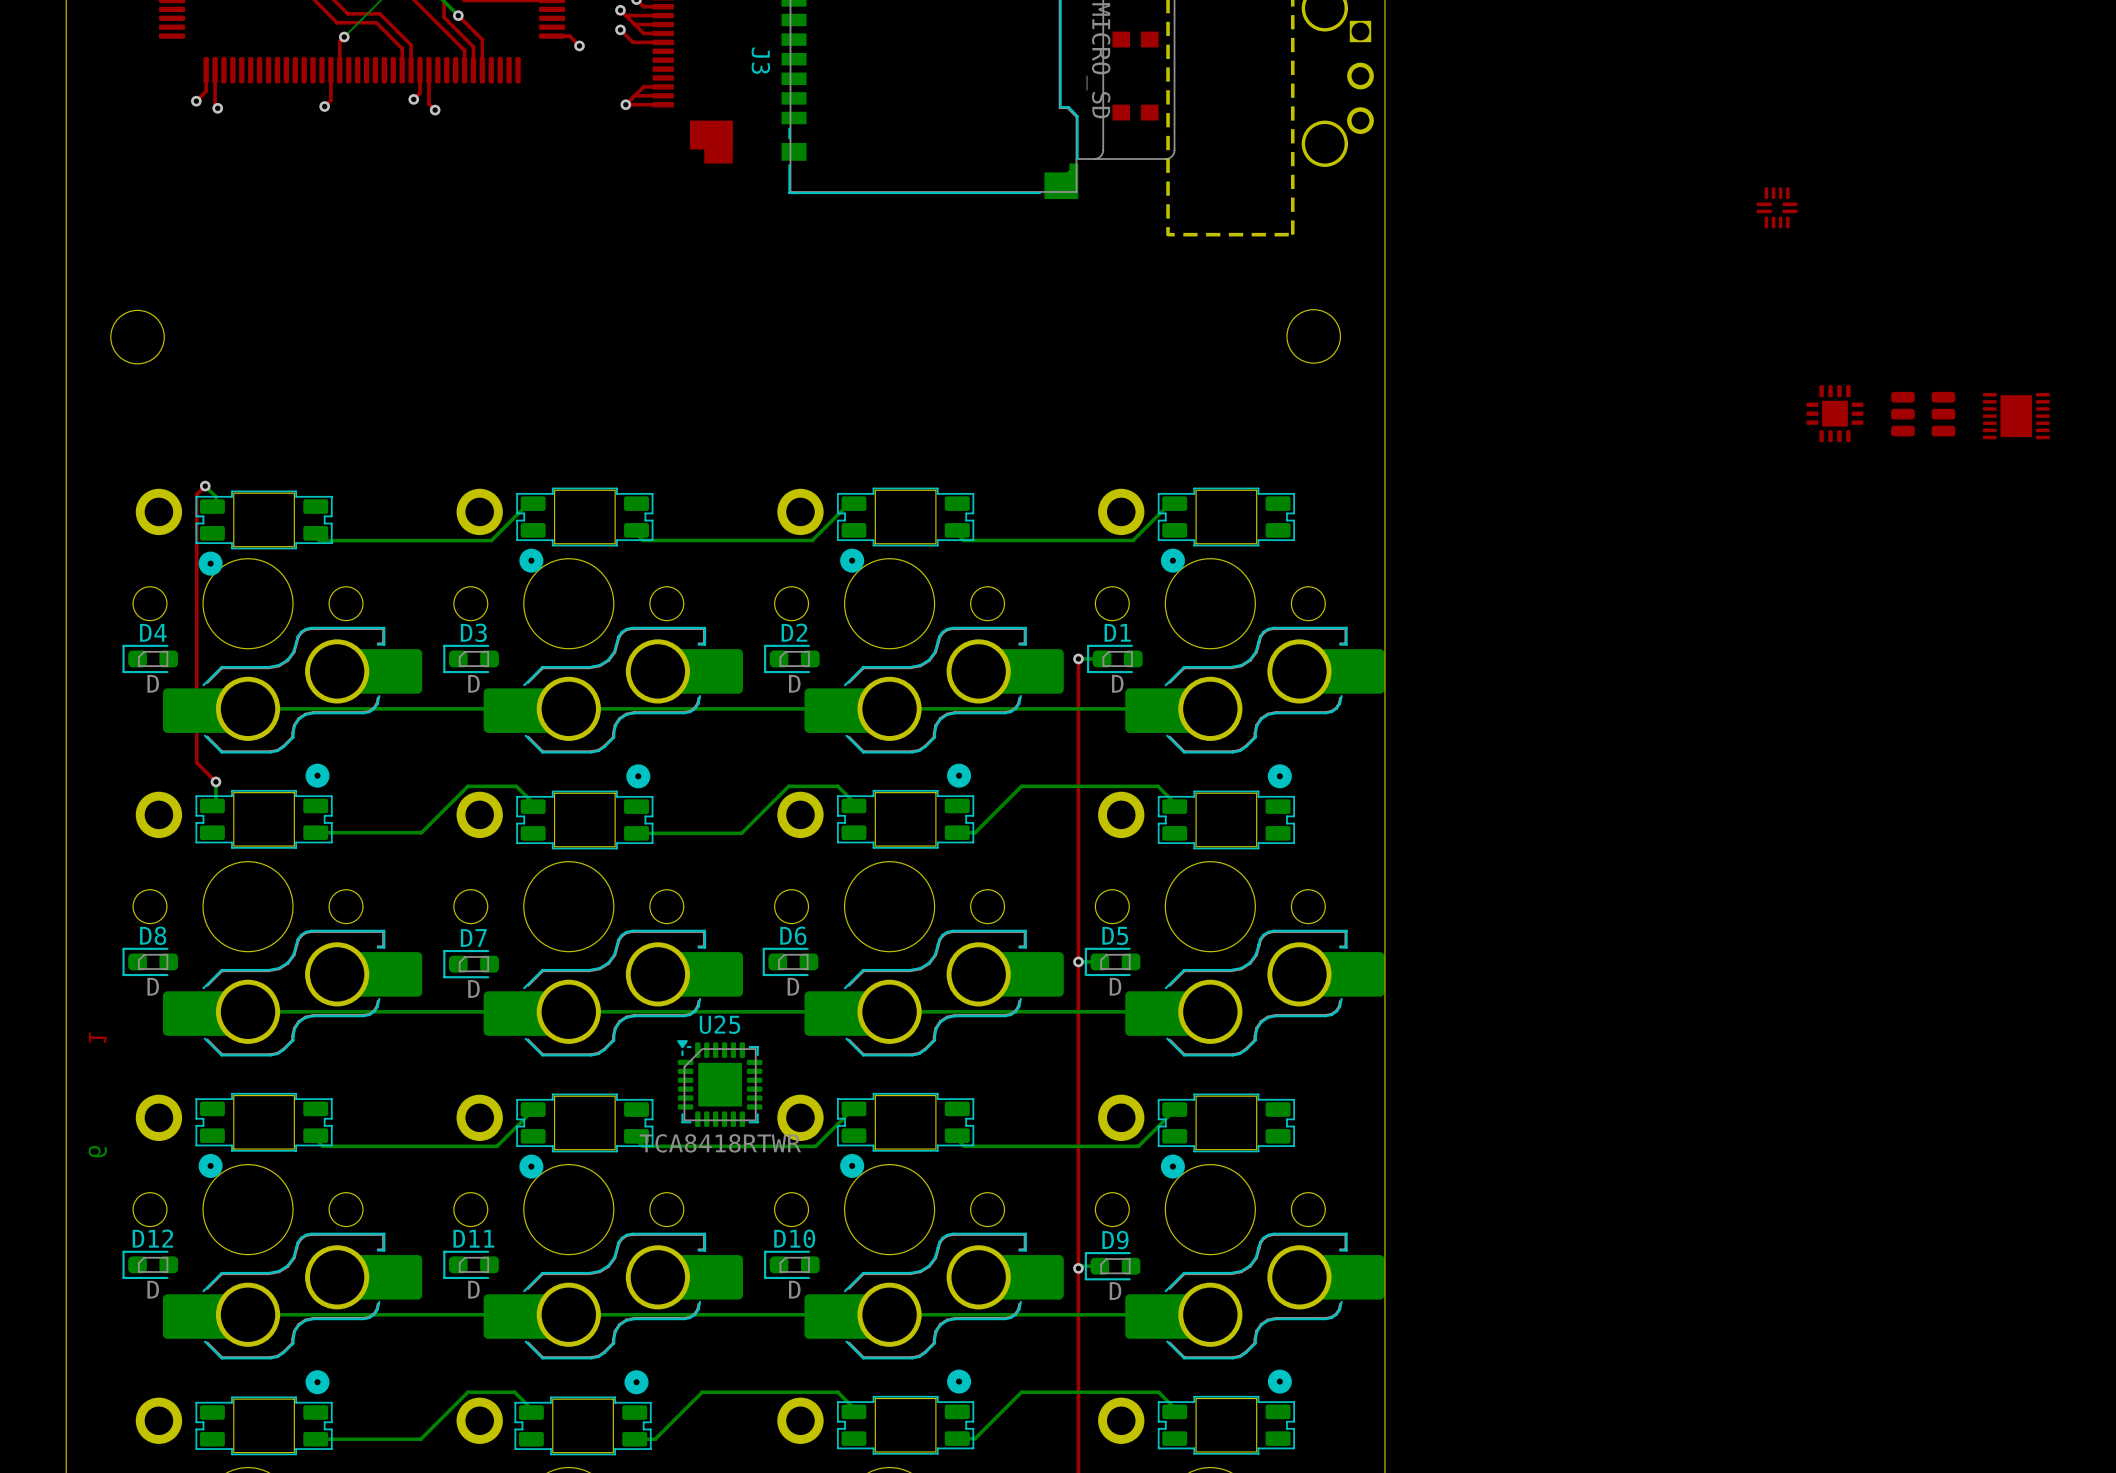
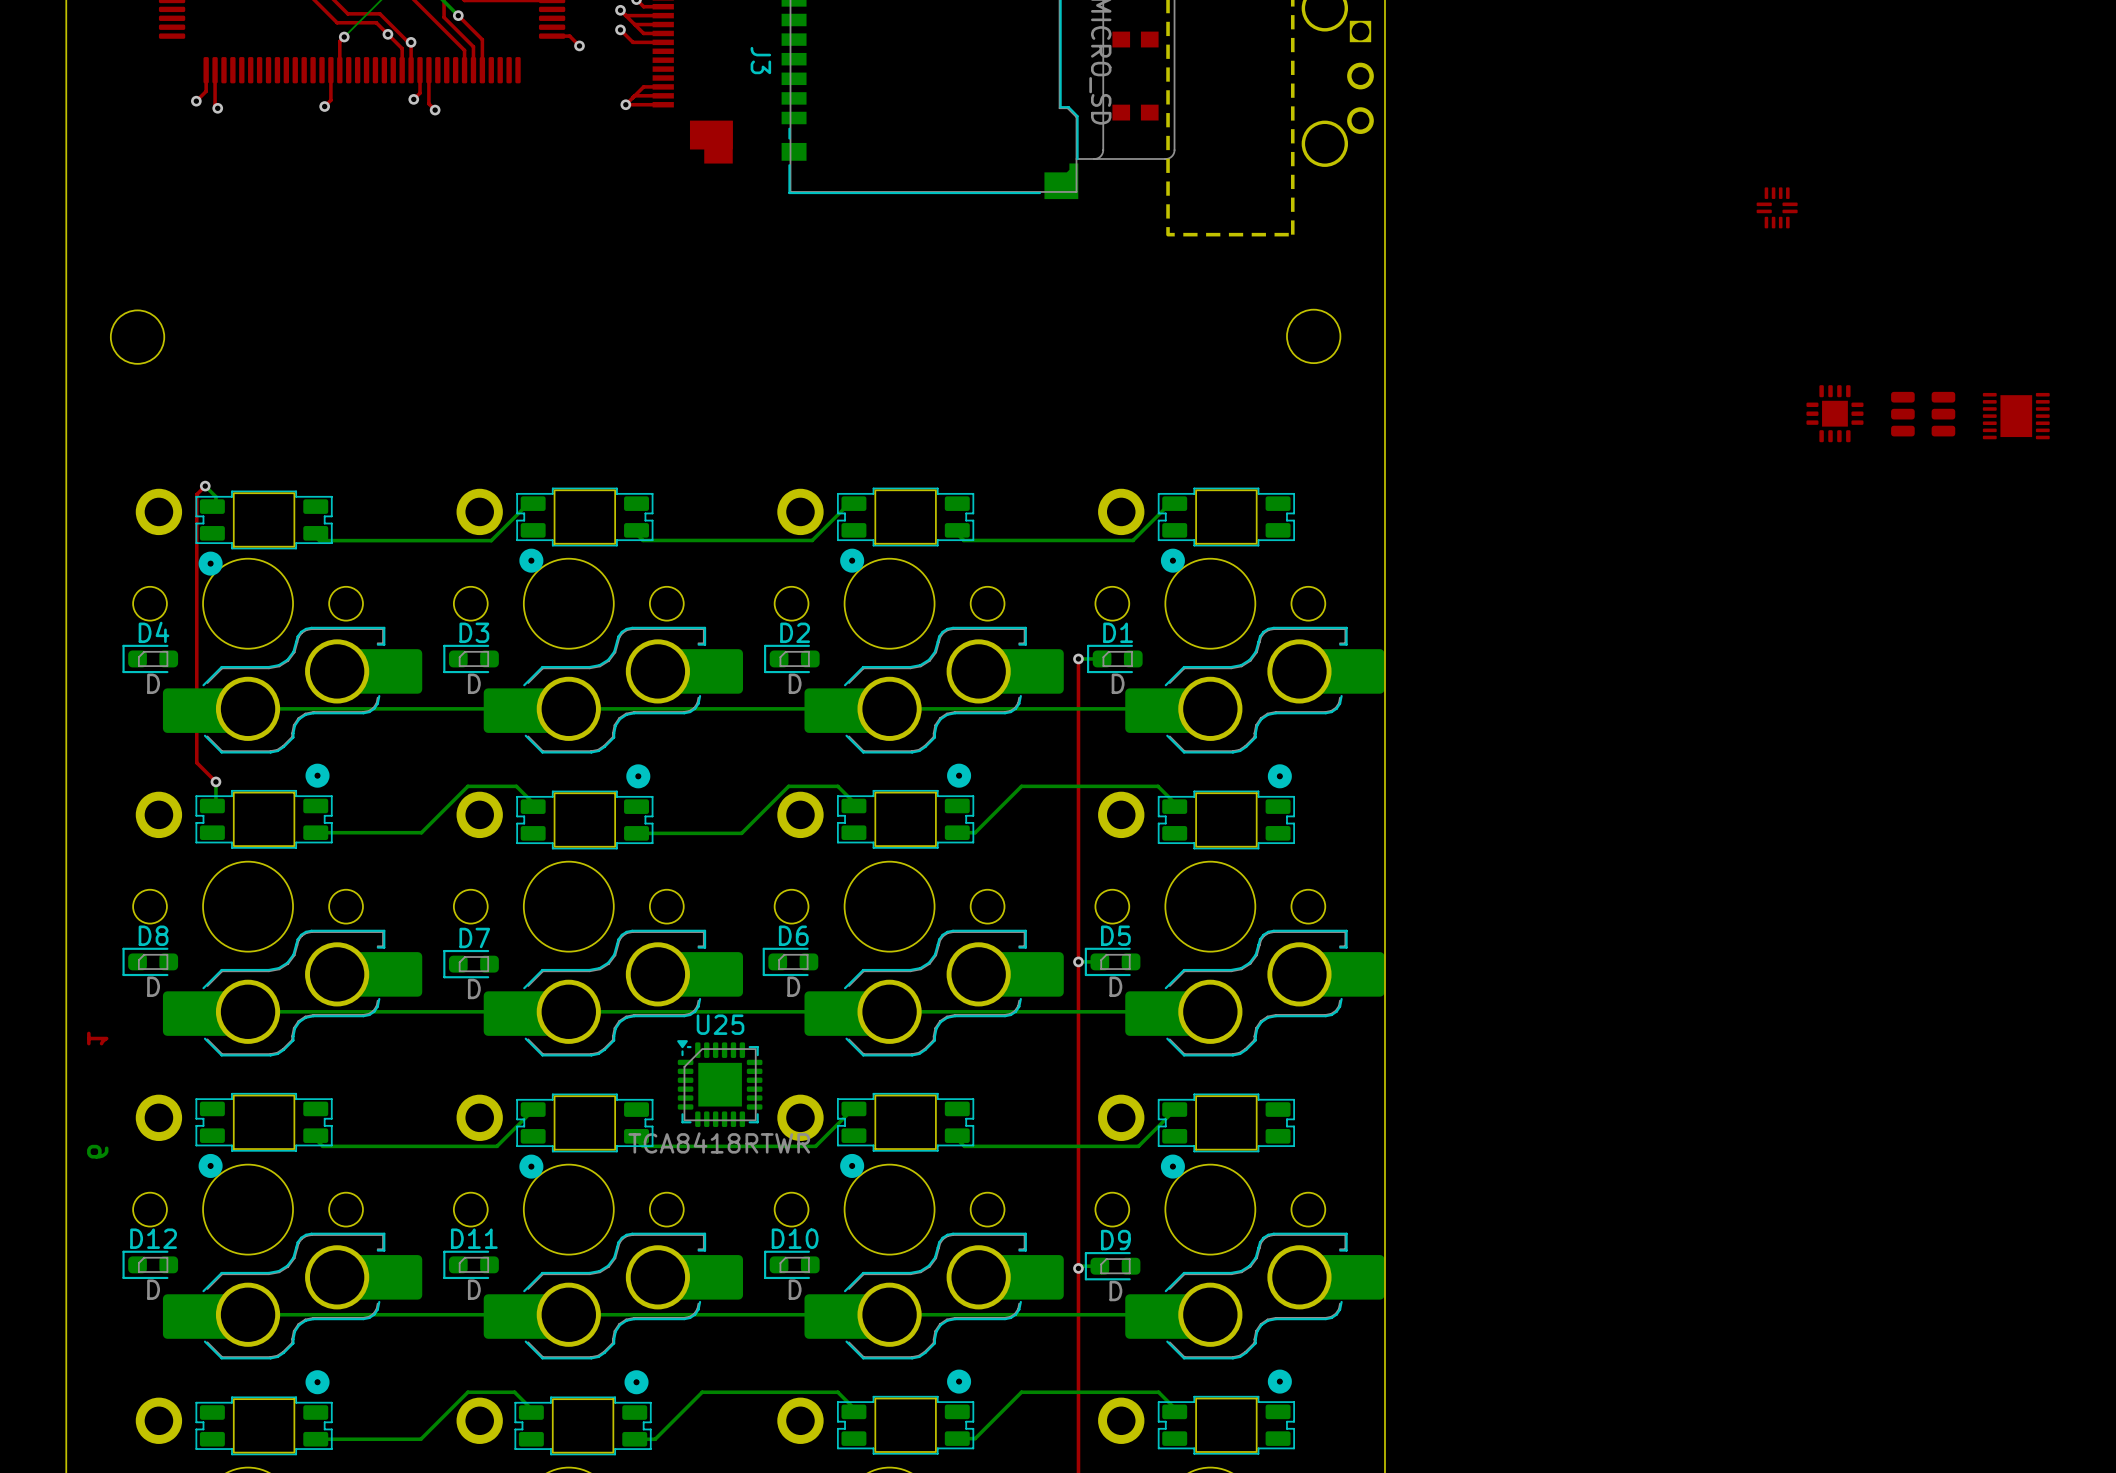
via: none -> (387, 34)
via: none -> (411, 42)

